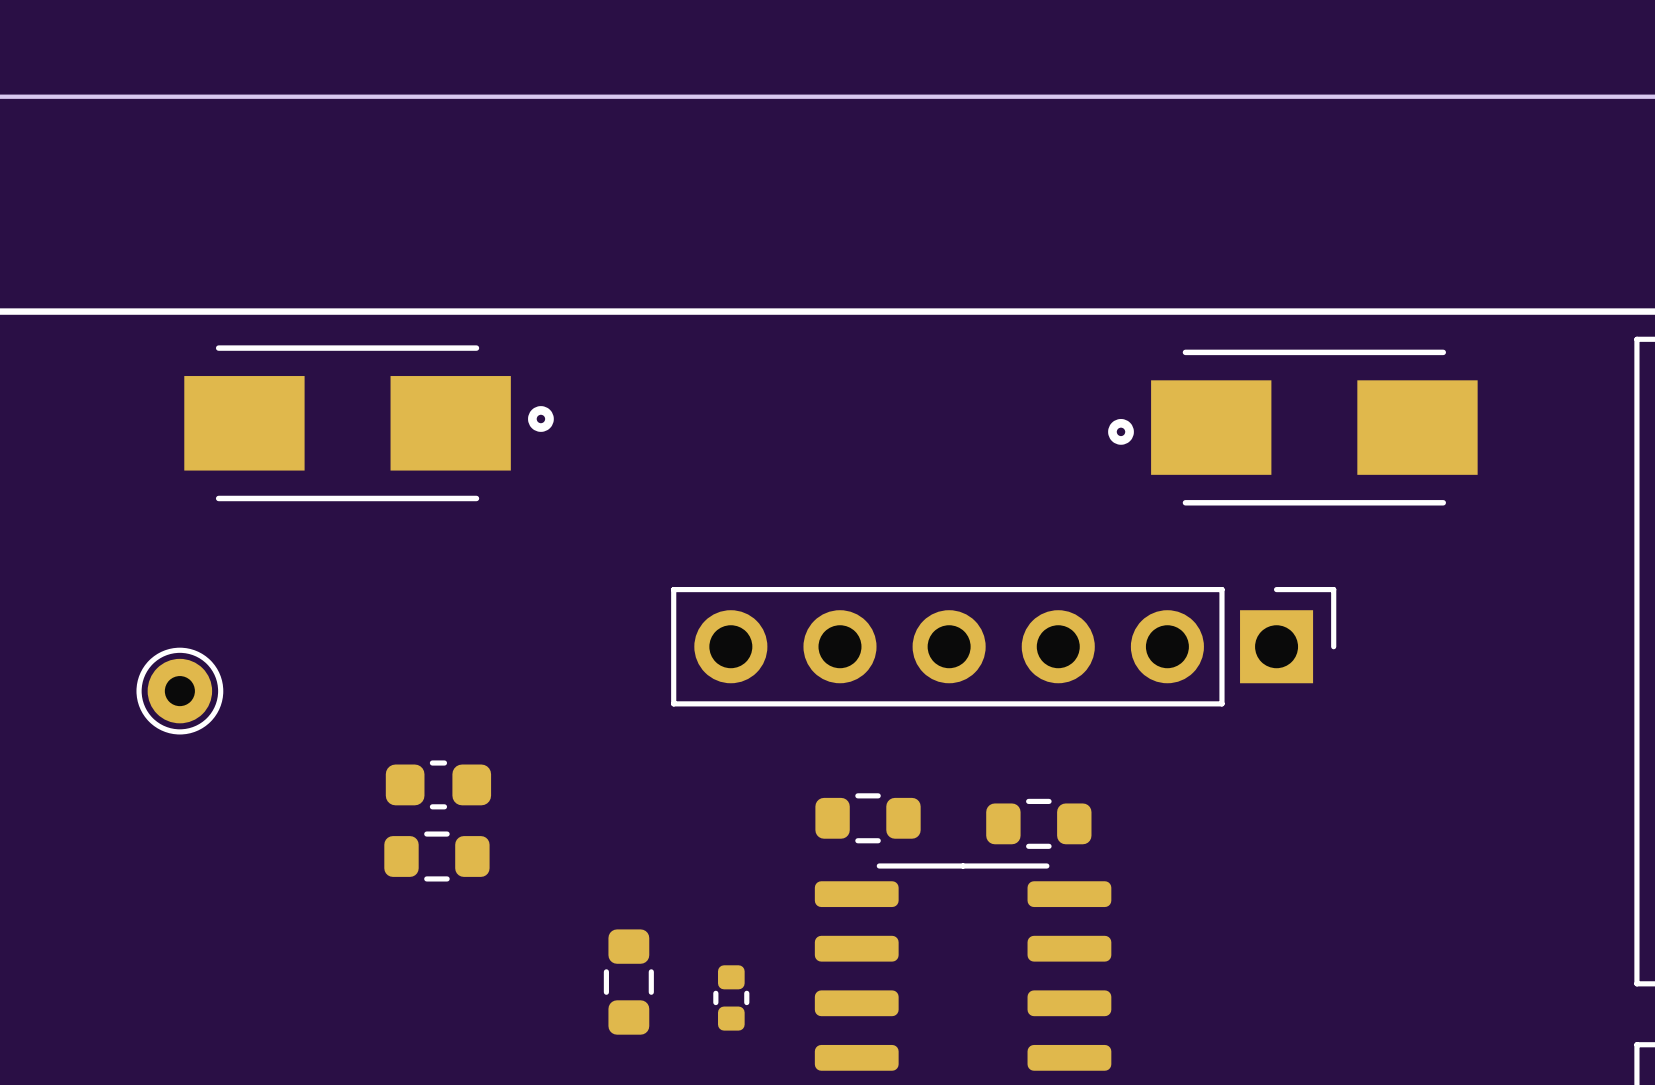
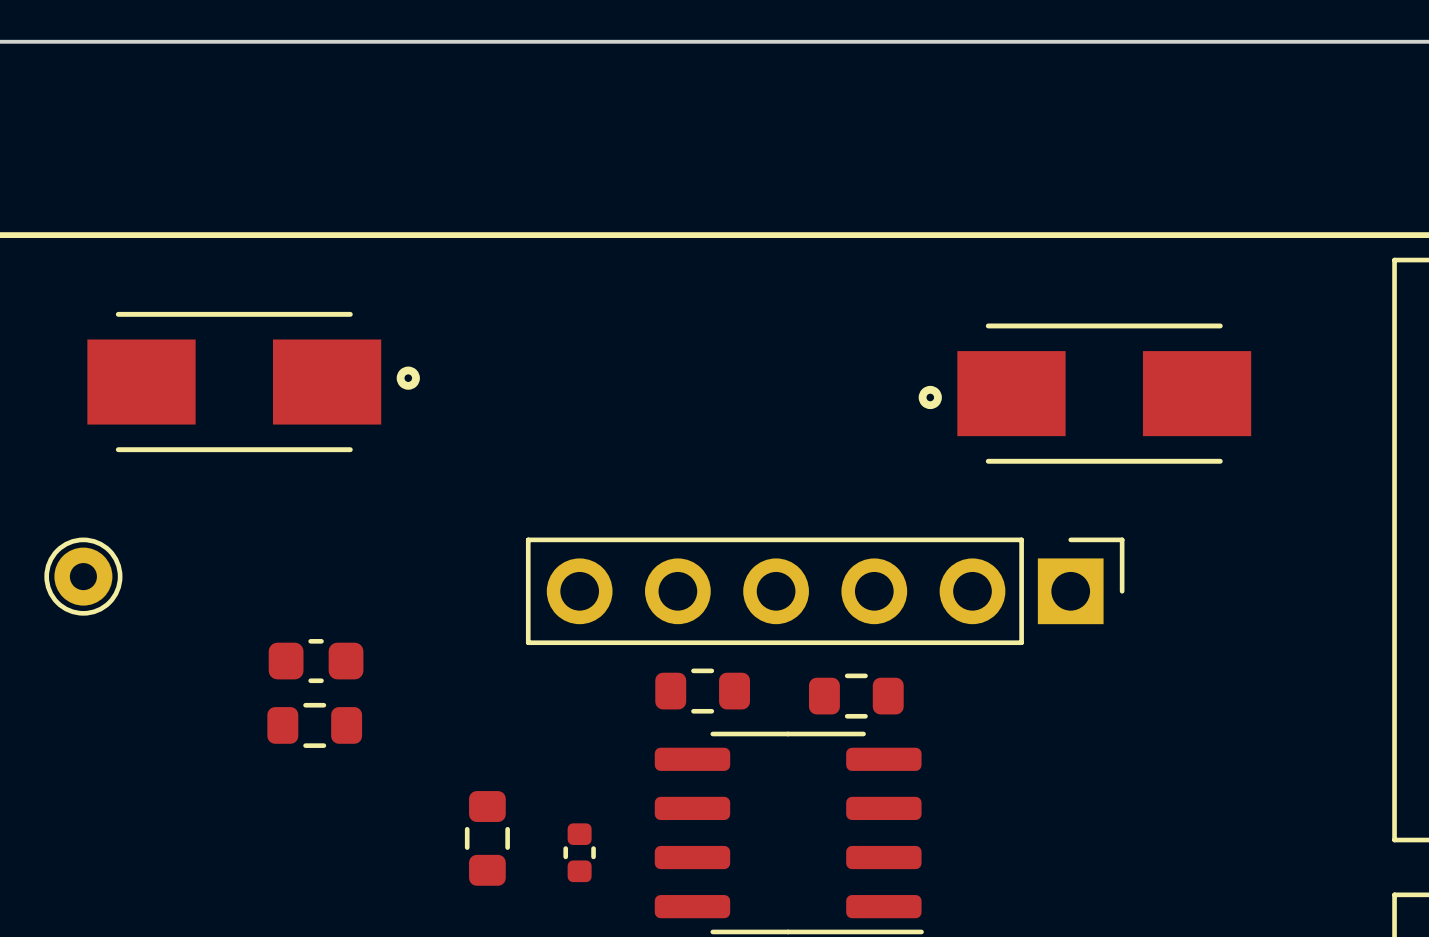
part position: (369, 423) -> (253, 382)
part position: (1292, 427) -> (1084, 393)
part position: (1003, 646) -> (825, 591)

